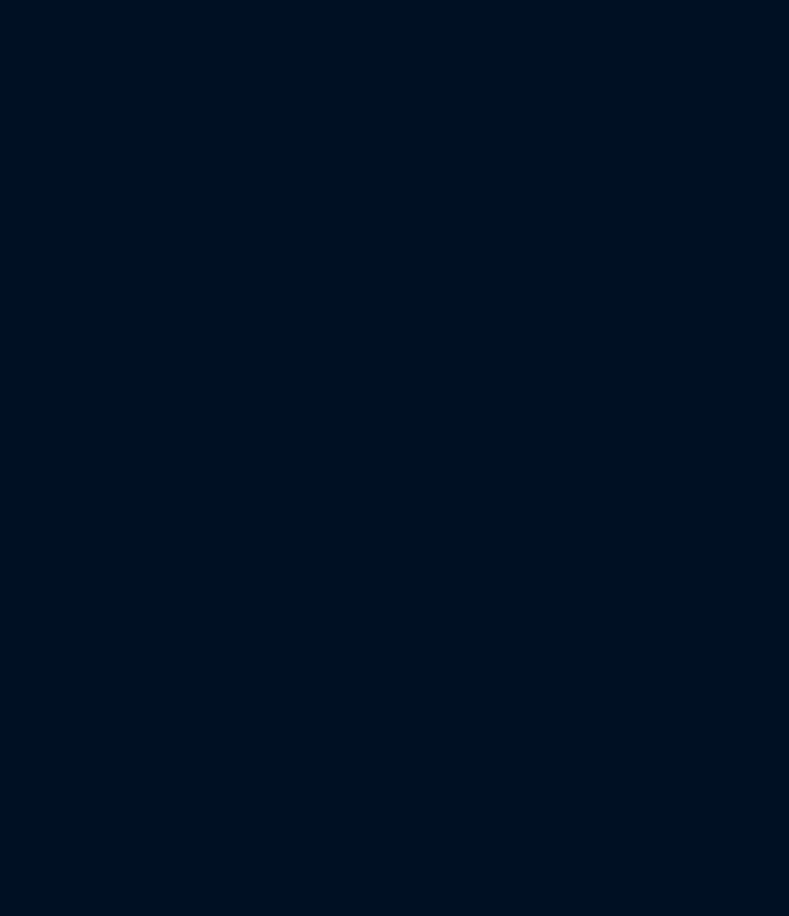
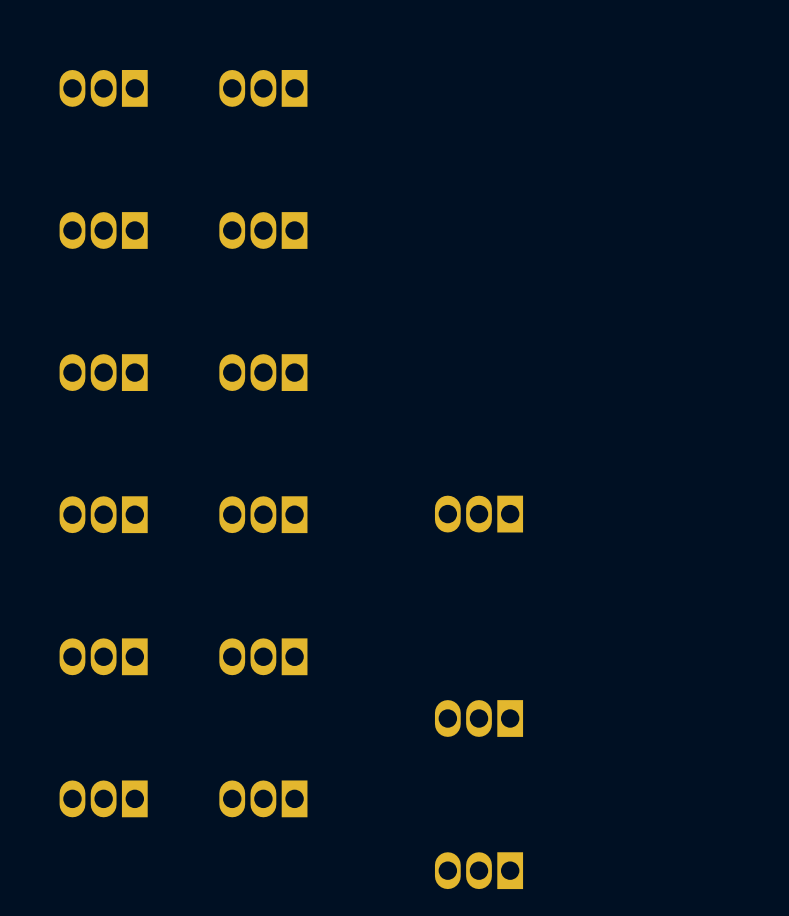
part: none -> (103, 88)
part: none -> (263, 88)
part: none -> (103, 230)
part: none -> (263, 230)
part: none -> (103, 372)
part: none -> (263, 372)
part: none -> (103, 514)
part: none -> (263, 514)
part: none -> (479, 514)
part: none -> (103, 656)
part: none -> (263, 656)
part: none -> (479, 718)
part: none -> (103, 798)
part: none -> (263, 798)
part: none -> (479, 870)

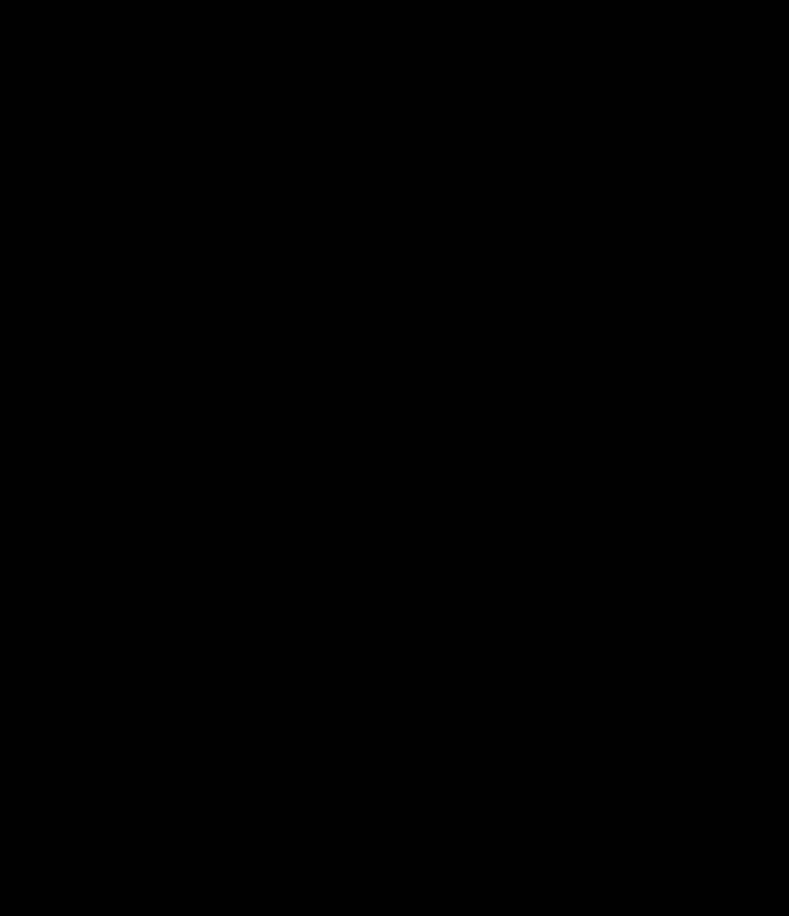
part: (103, 88) -> none
part: (263, 88) -> none
part: (103, 230) -> none
part: (263, 230) -> none
part: (103, 372) -> none
part: (263, 372) -> none
part: (103, 514) -> none
part: (263, 514) -> none
part: (479, 514) -> none
part: (103, 656) -> none
part: (263, 656) -> none
part: (479, 718) -> none
part: (103, 798) -> none
part: (263, 798) -> none
part: (479, 870) -> none

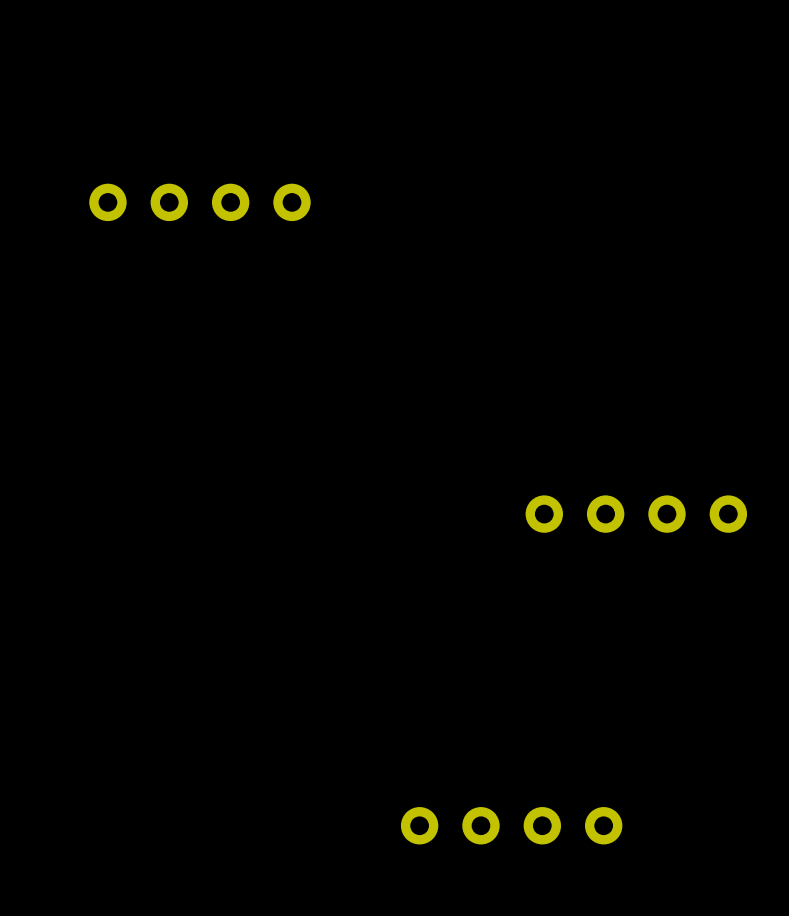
part: none -> (199, 202)
part: none -> (636, 514)
part: none -> (511, 825)

